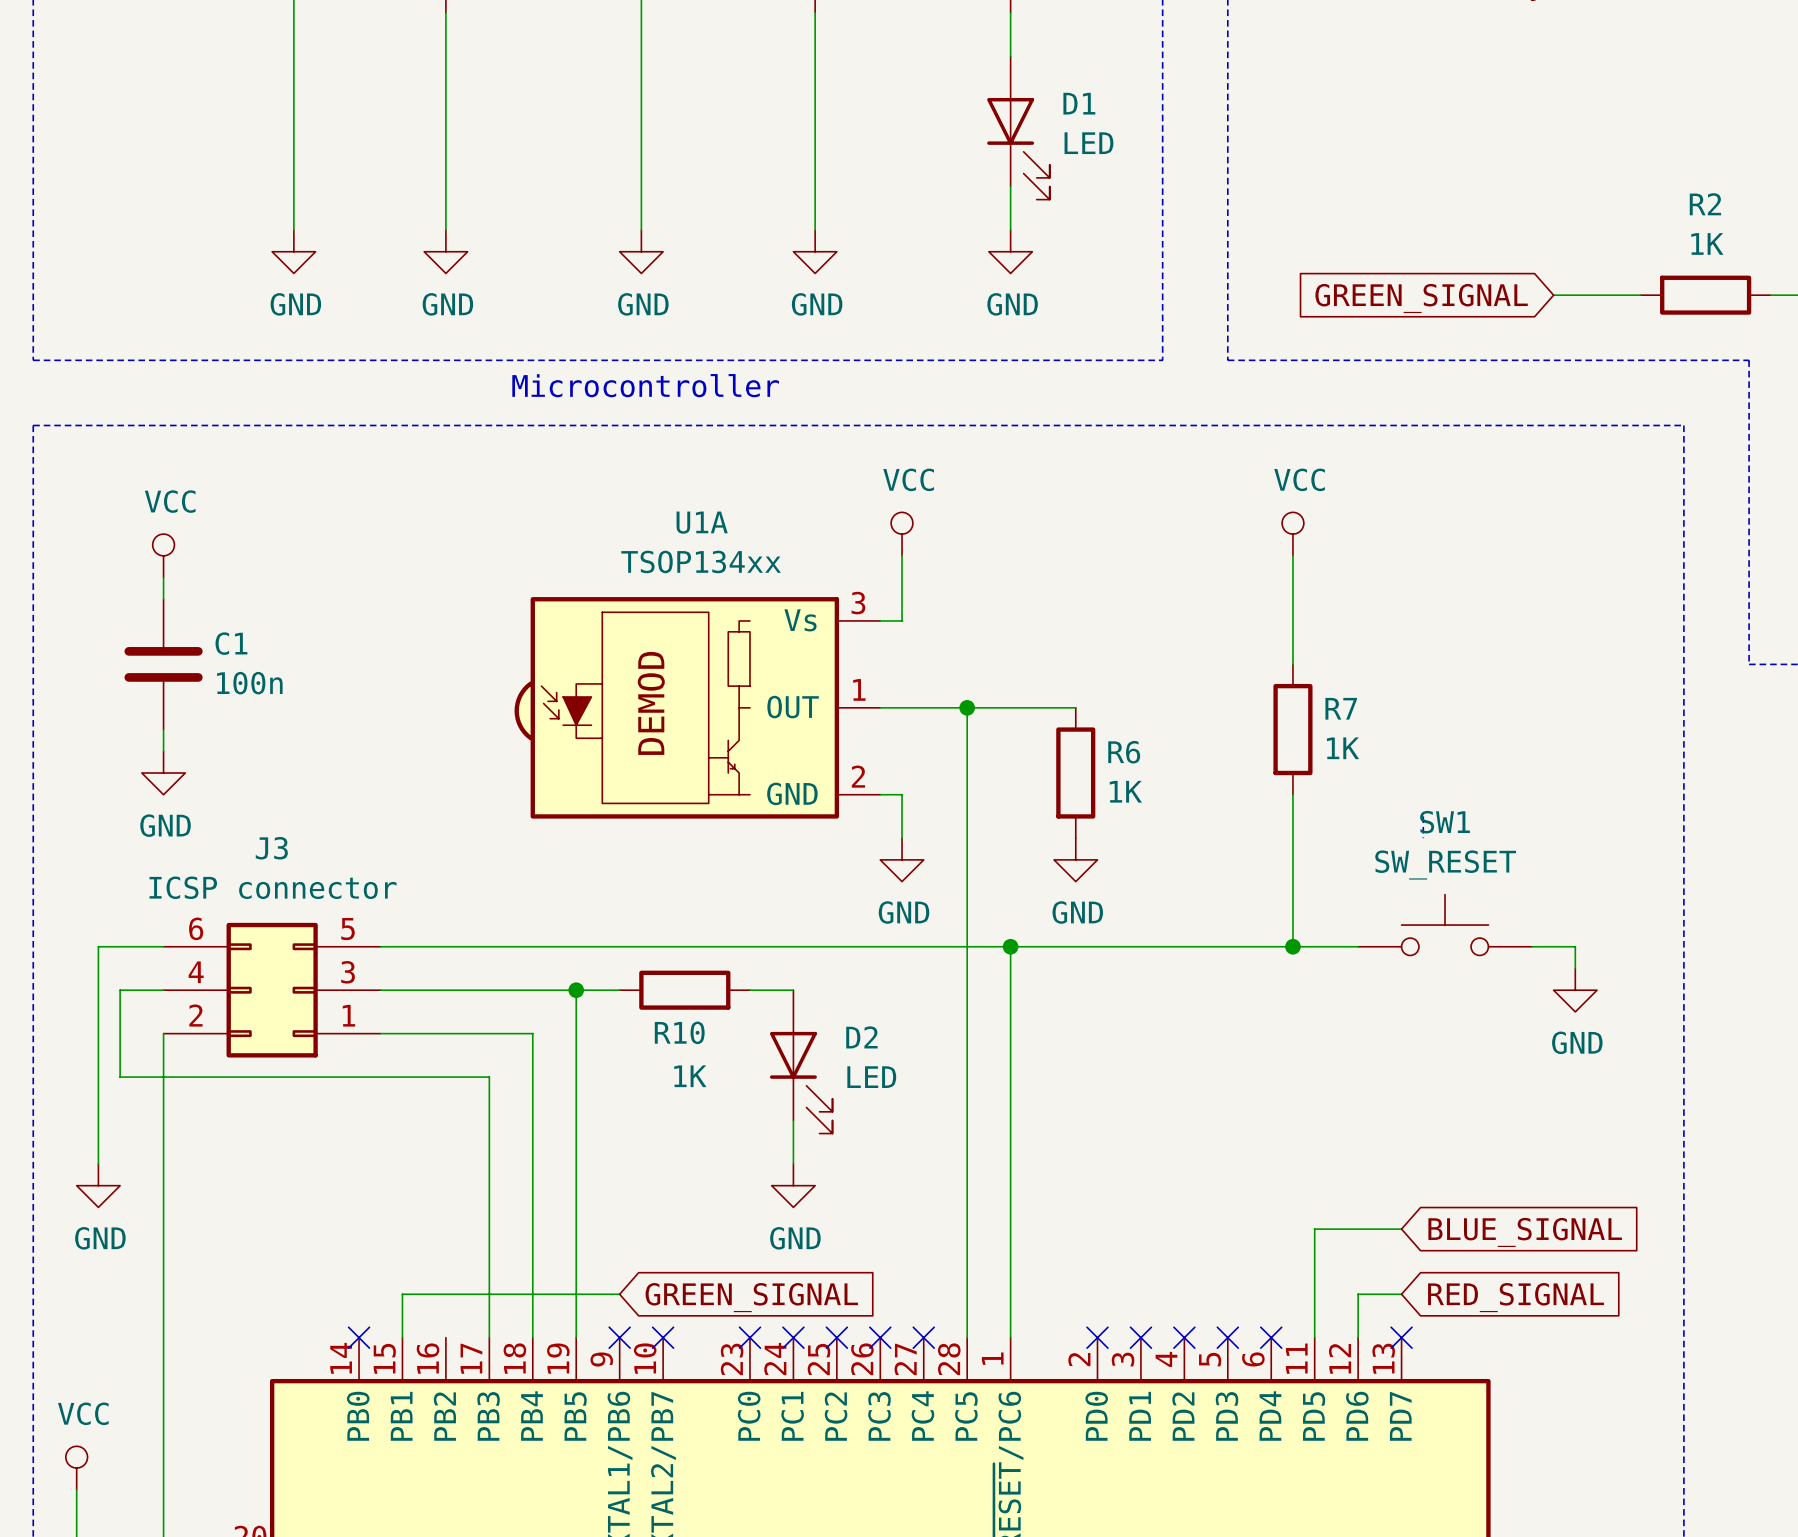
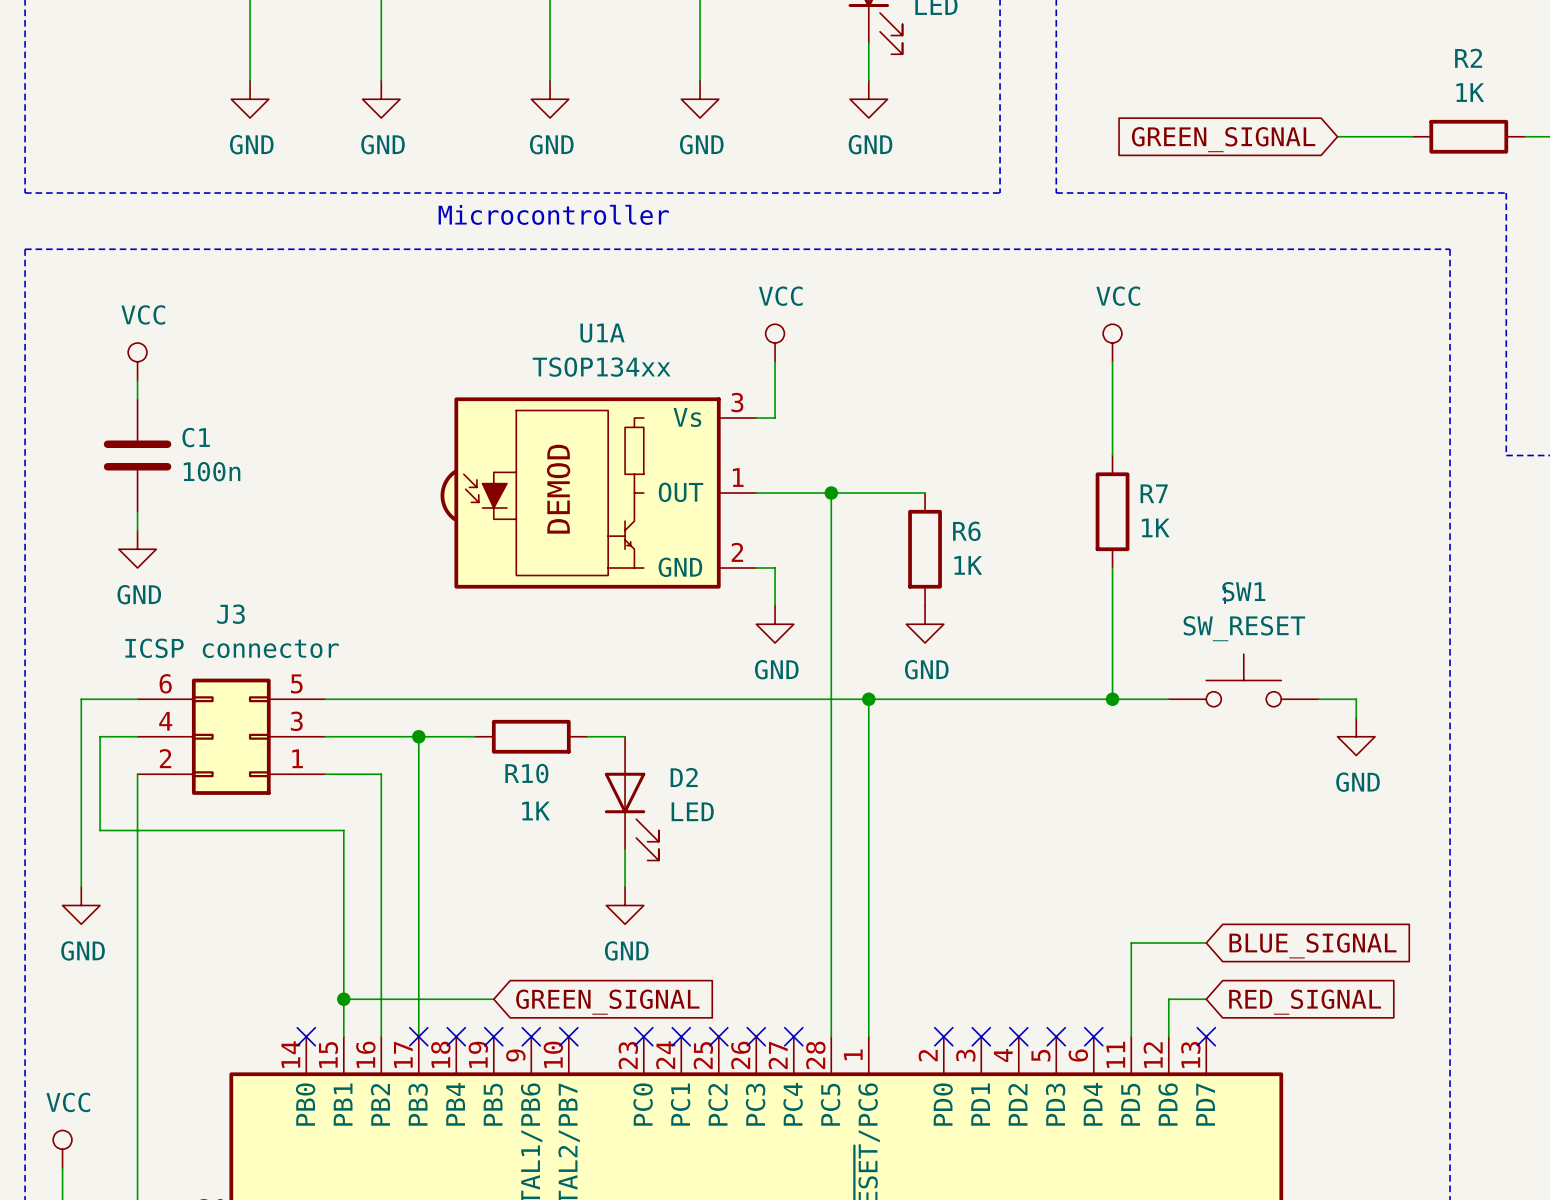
wire: none -> (418, 736) (418, 811)
wire: (554, 990) (619, 990) -> none
wire: (576, 990) (576, 1337) -> none
junction position: (576, 990) -> (418, 736)
R10 position: (684, 990) -> (531, 736)
wire: (749, 990) (793, 990) -> (587, 736) (625, 736)
wire: (445, 1033) (532, 1033) (532, 1337) -> (381, 774) (381, 1036)
D2 position: (801, 1061) -> (631, 798)
wire: (120, 1077) (489, 1077) -> (100, 811) (100, 830) (343, 830) (343, 999)
wire: (793, 1120) (793, 1163) -> (625, 849) (625, 886)
power symbol position: GND (793, 1185) -> GND (625, 905)
junction: none -> (343, 999)
wire: (576, 1294) (619, 1294) -> none
global label position: GREEN_SIGNAL (751, 1297) -> GREEN_SIGNAL (607, 1002)
no-connect mark: none -> (418, 1036)
no-connect mark: none -> (456, 1036)
no-connect mark: none -> (493, 1036)

